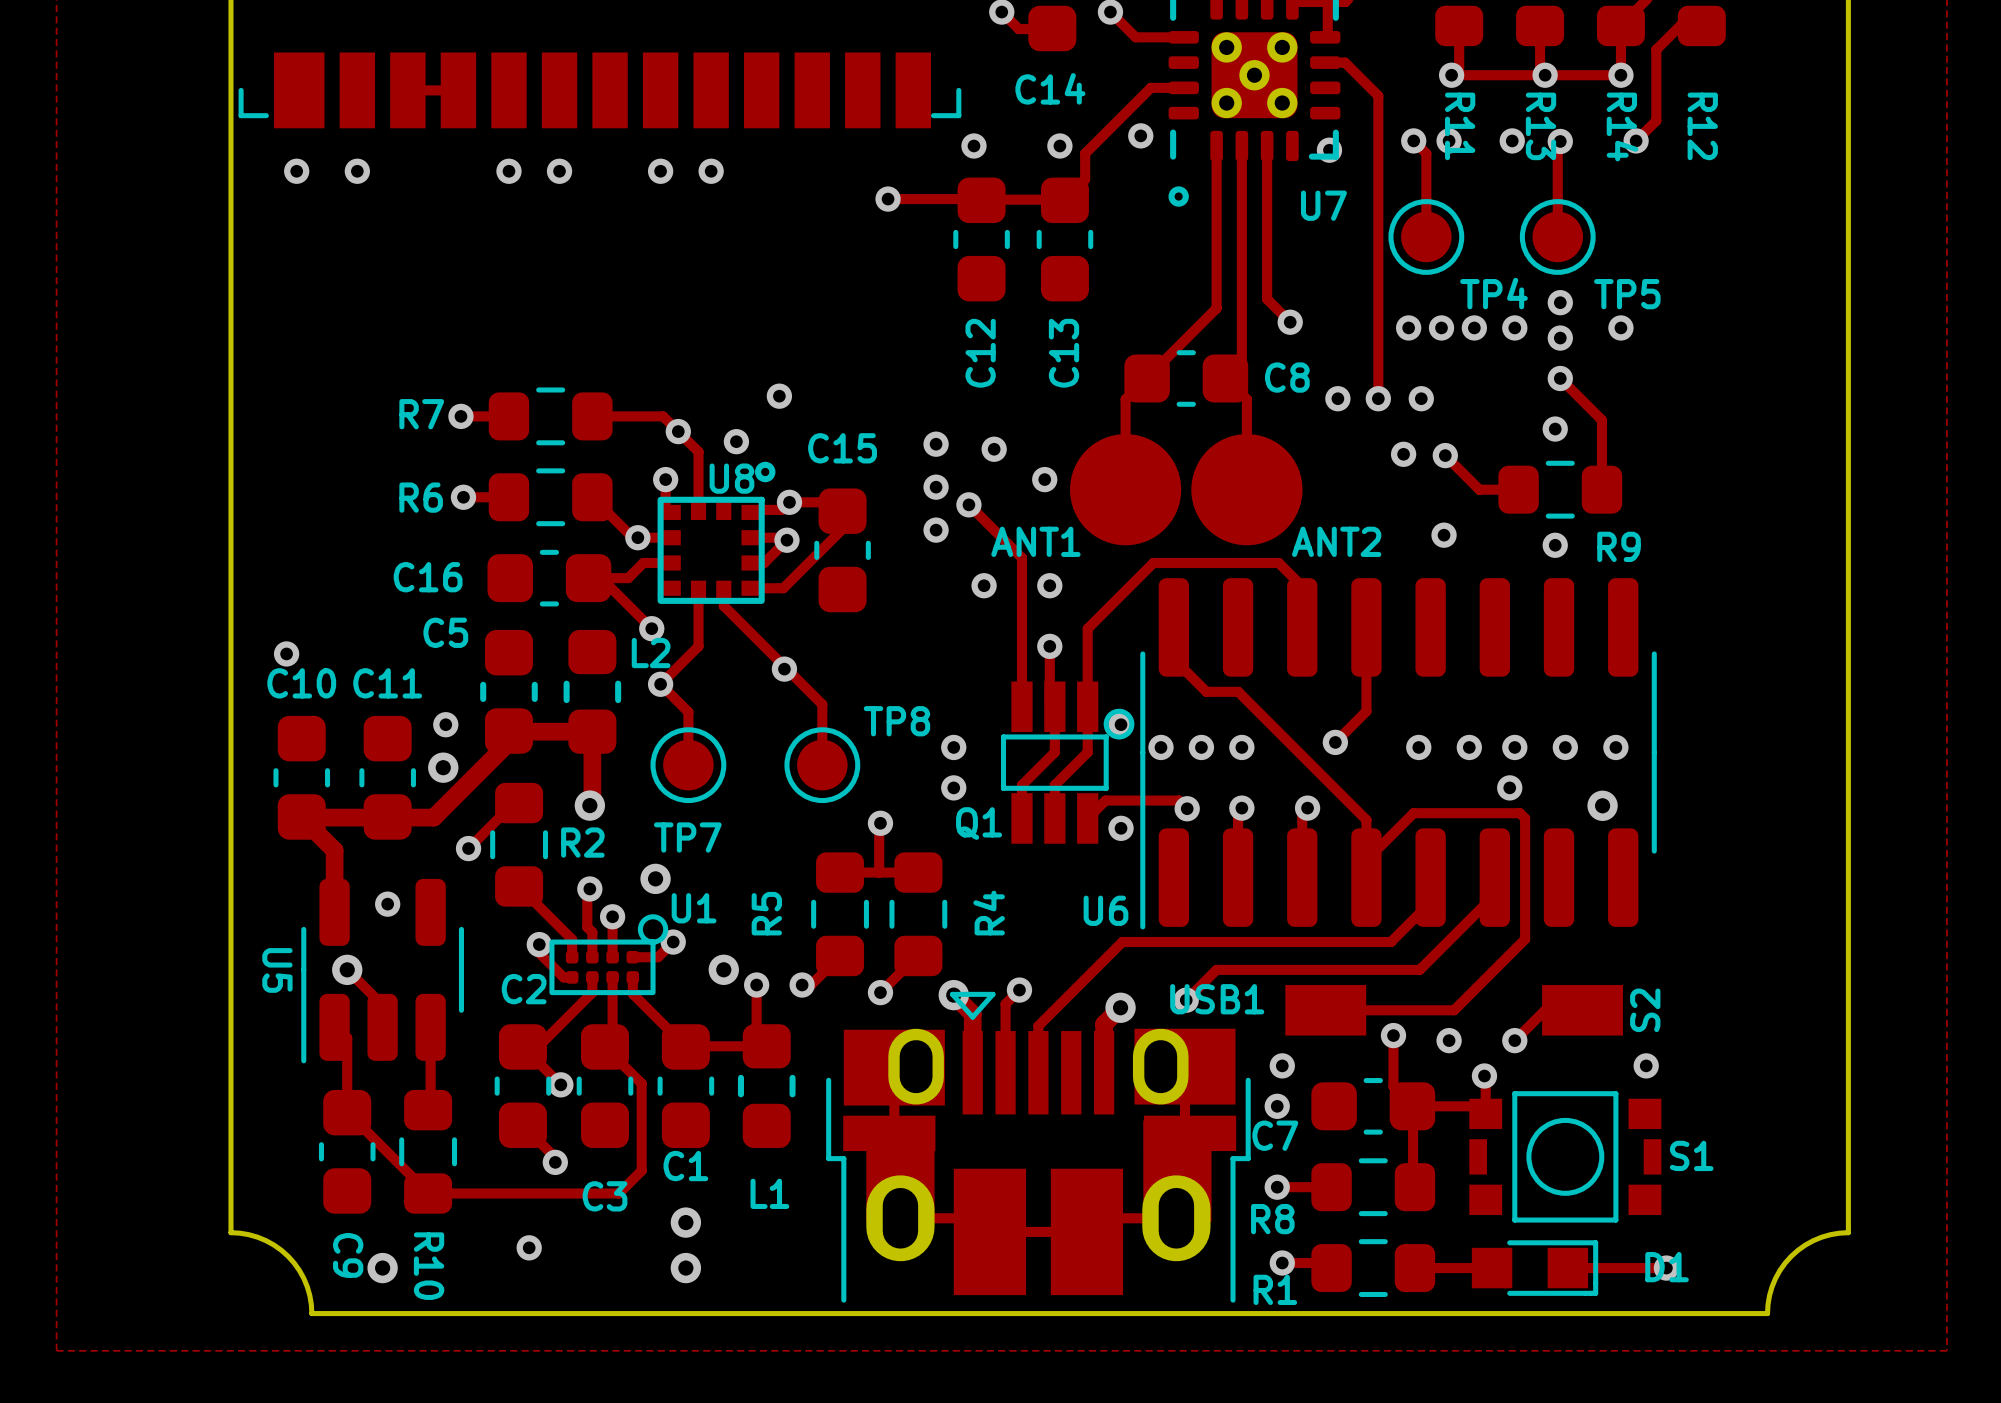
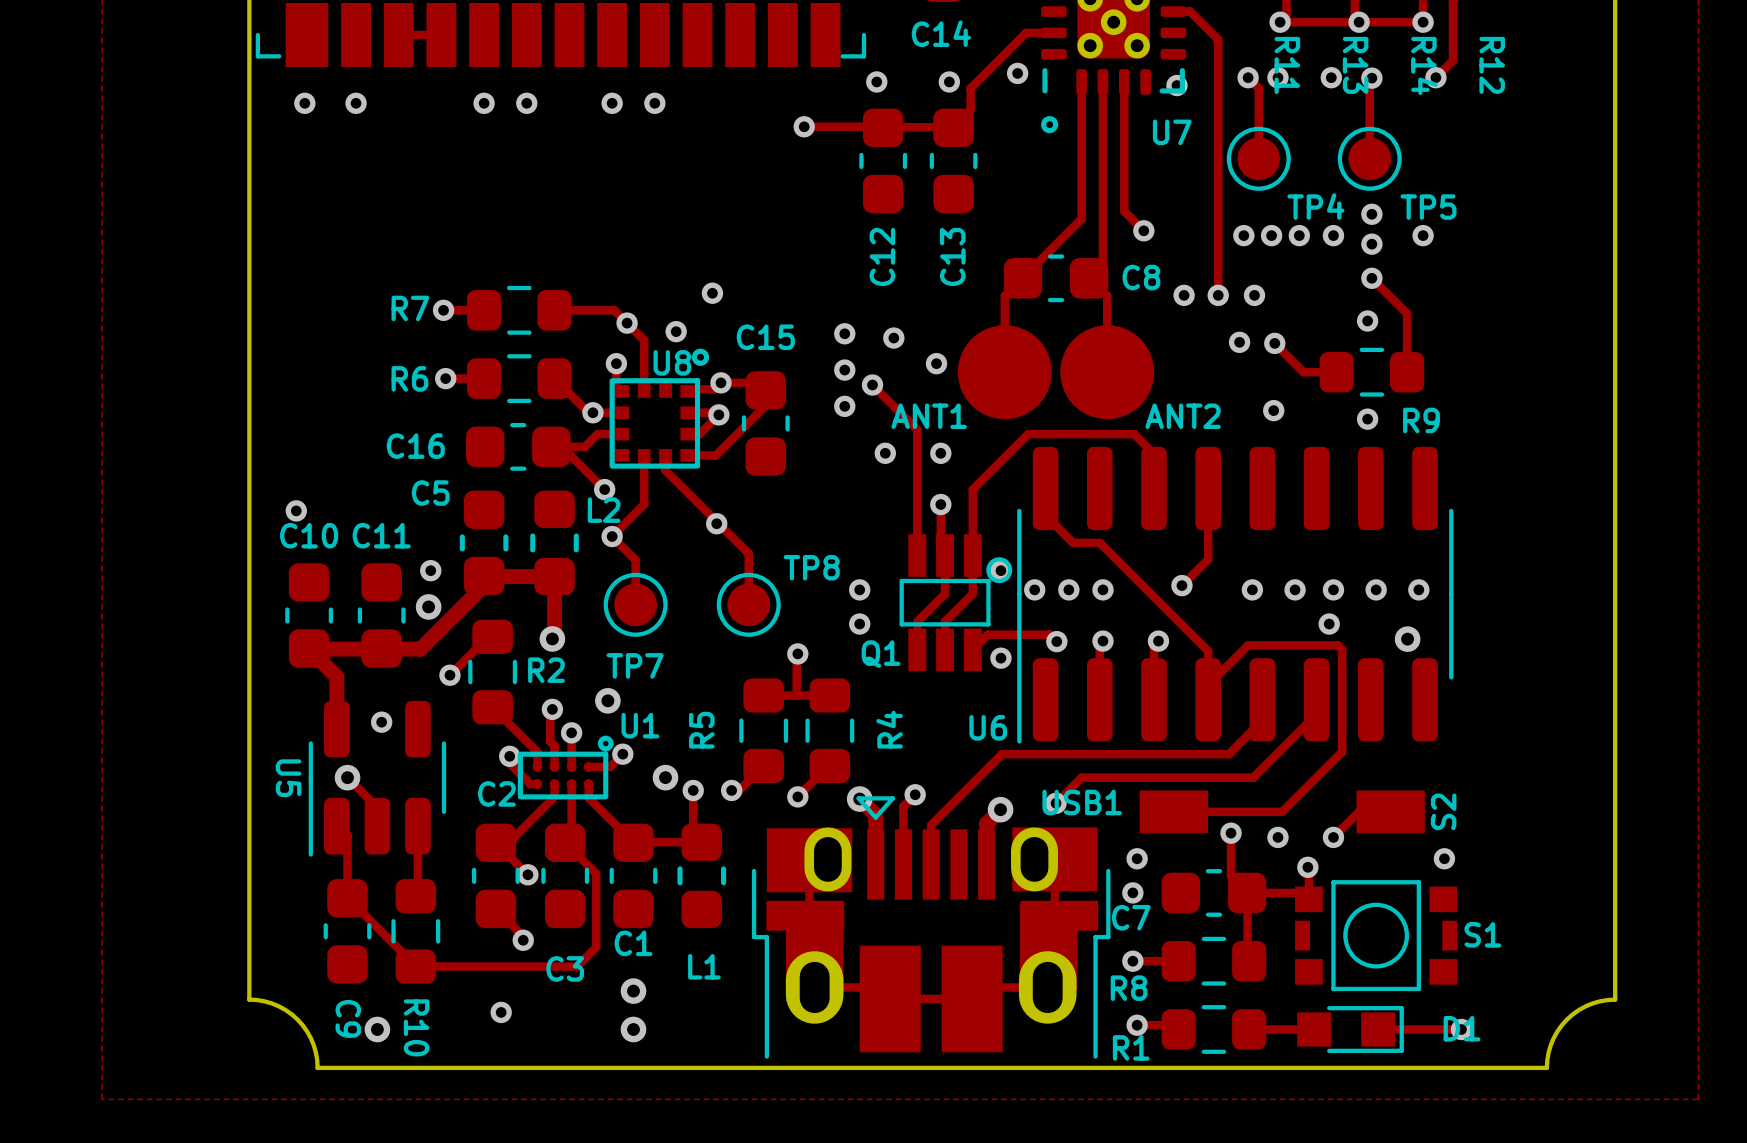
U1 footprint: [549, 914, 669, 996] -> [517, 735, 614, 800]

